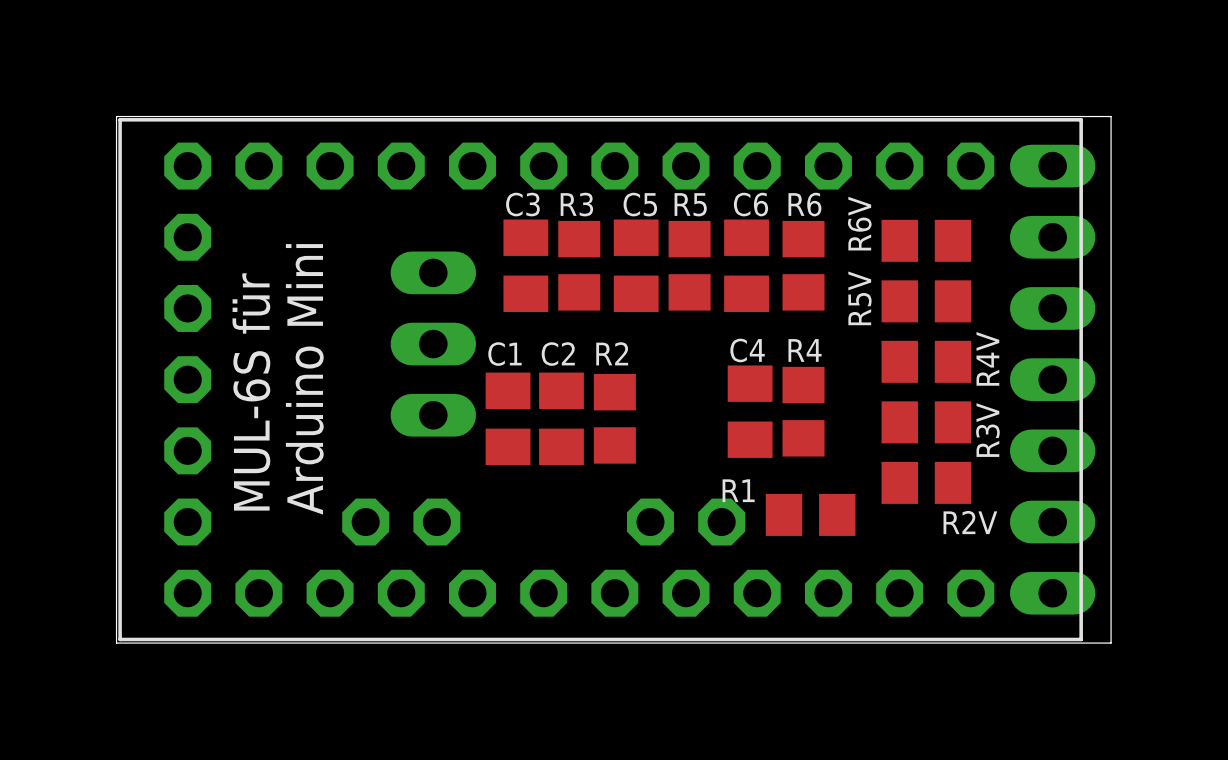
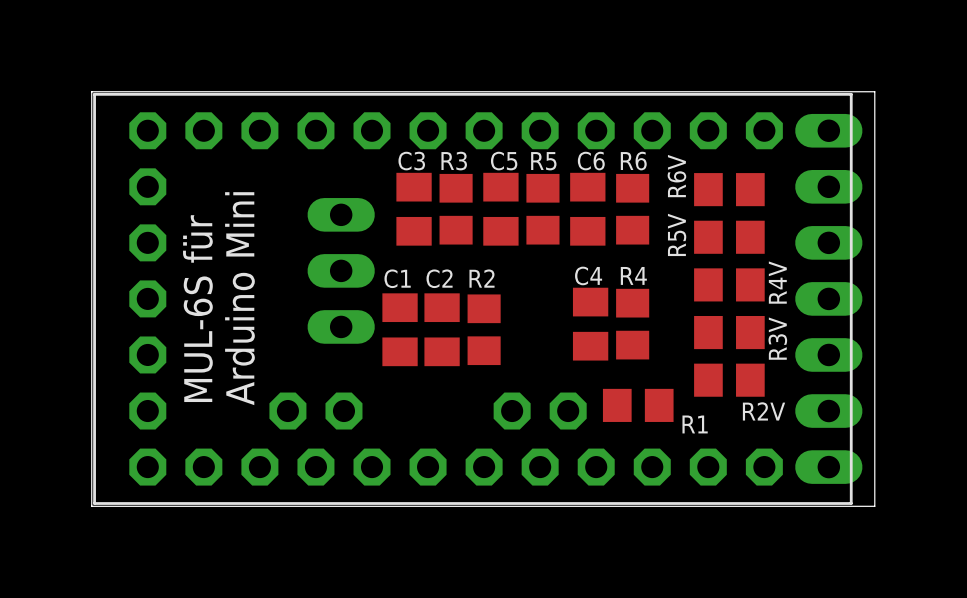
R1 name position: R1 (738, 490) -> R1 (695, 424)

